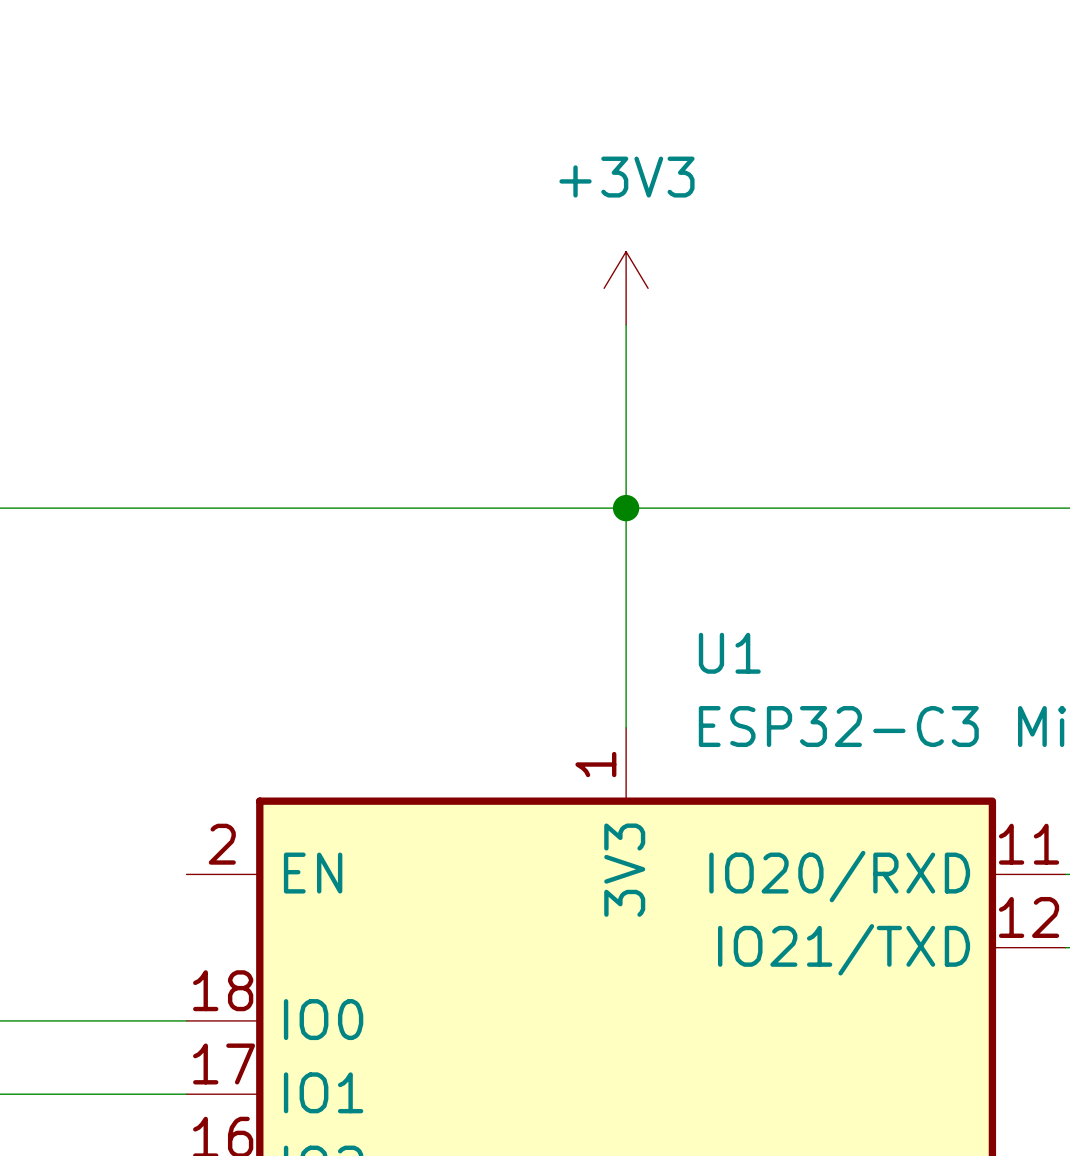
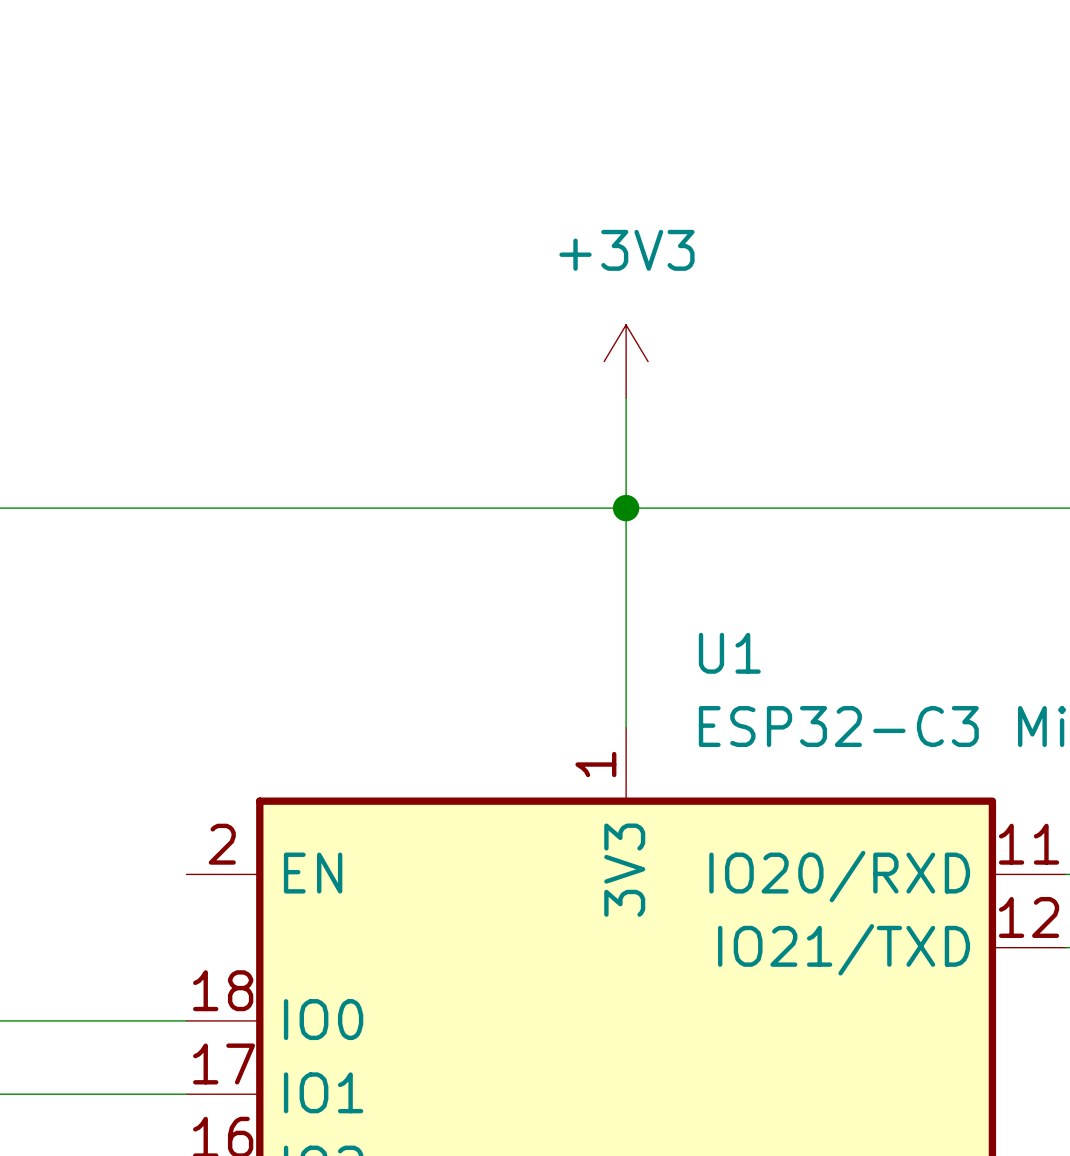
power symbol position: +3V3 (626, 288) -> +3V3 (626, 361)

